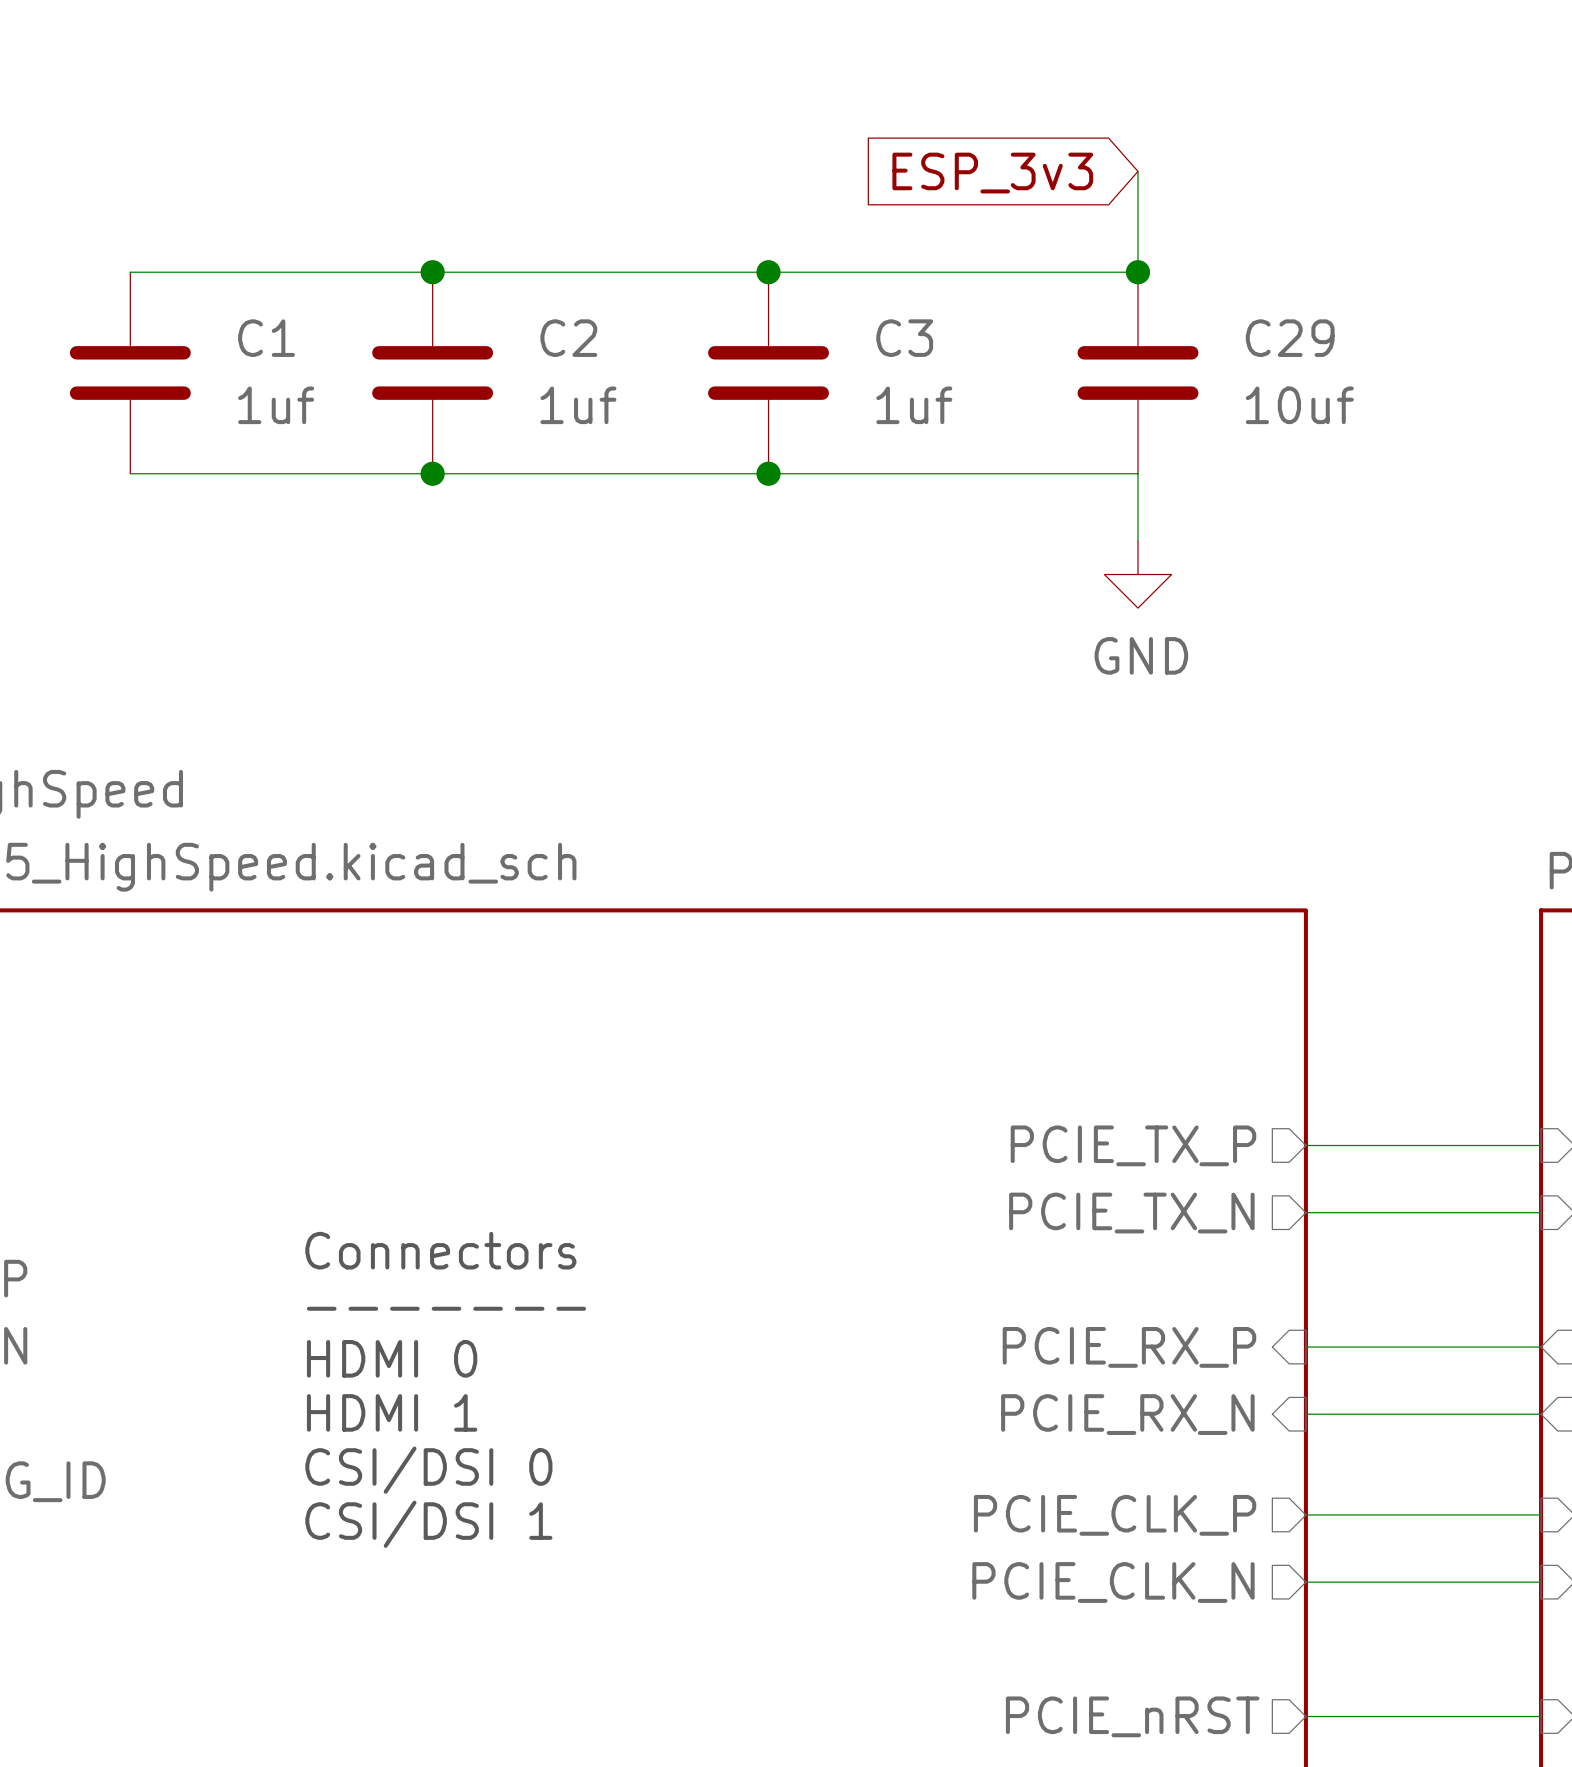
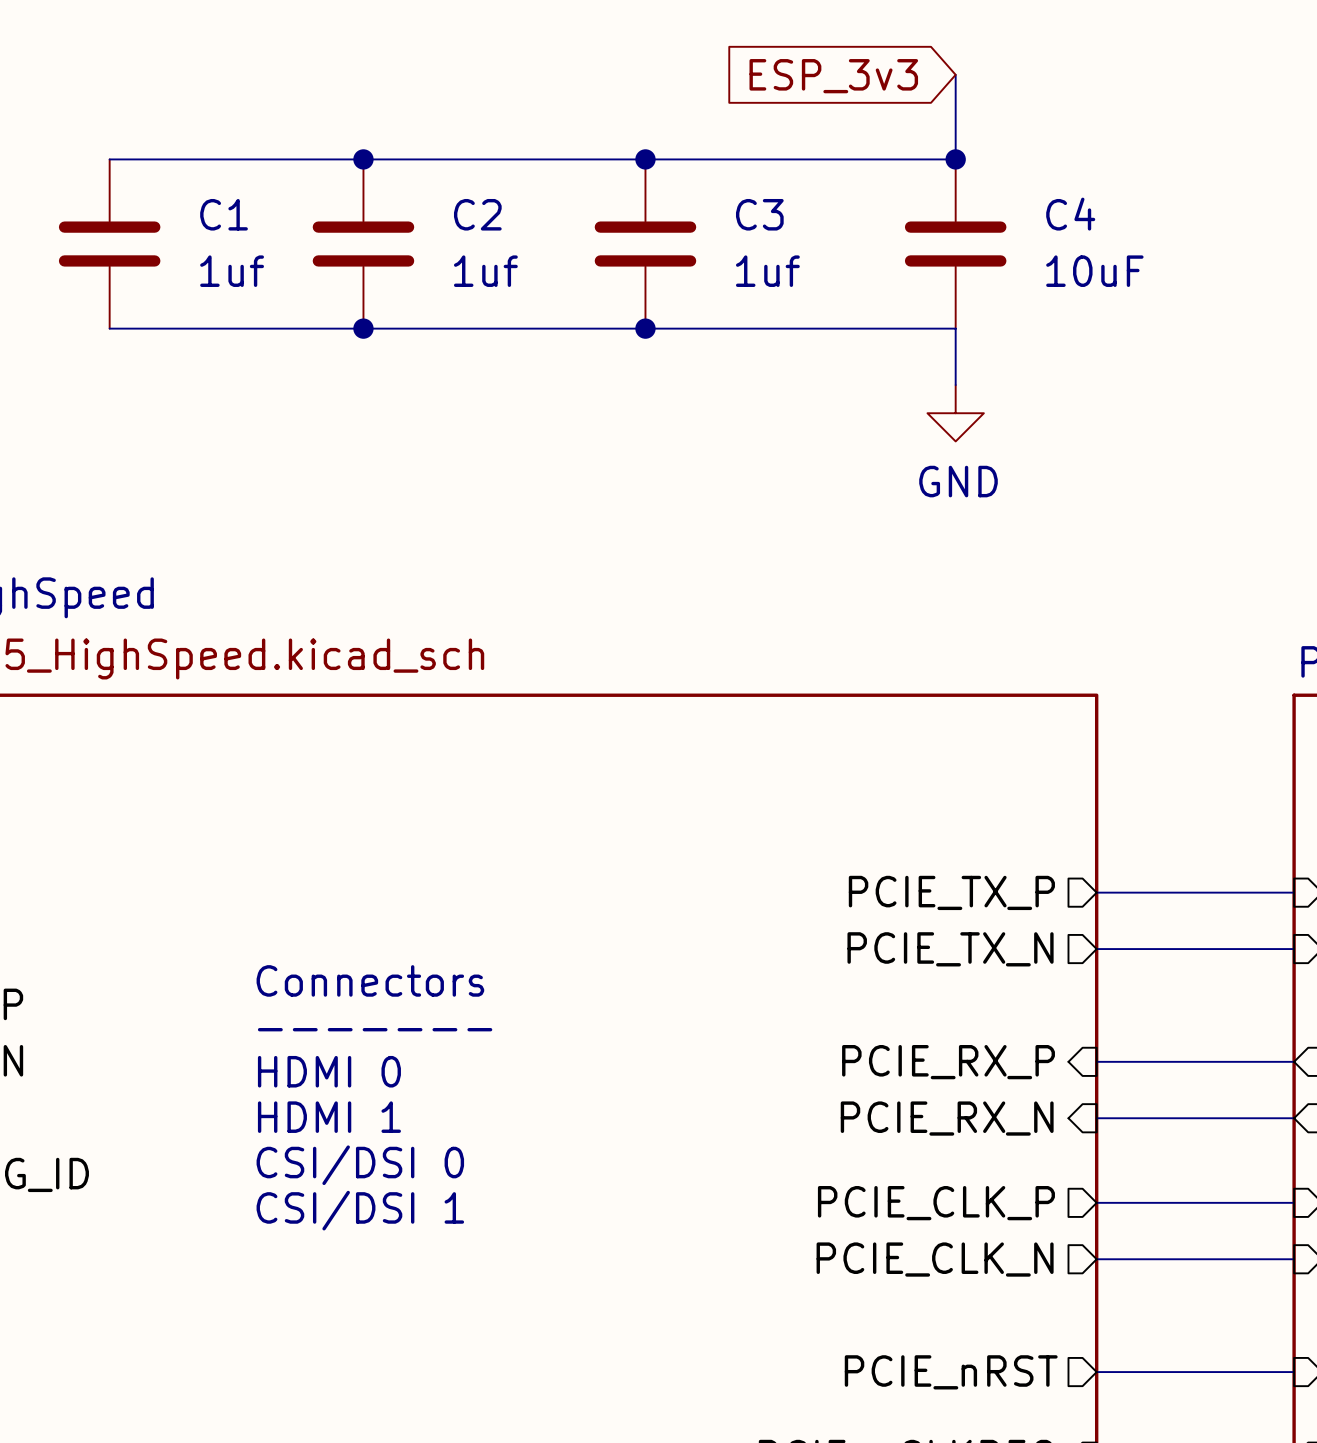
C29 name: C29 (1290, 338) -> C4 (1070, 214)
C29 value: 10uf (1299, 405) -> 10uF (1094, 271)

